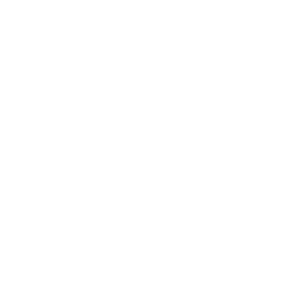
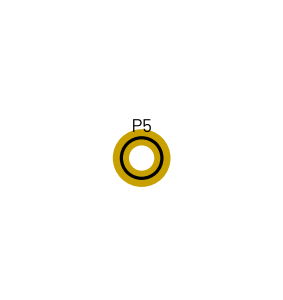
P5: none -> (141, 158)

